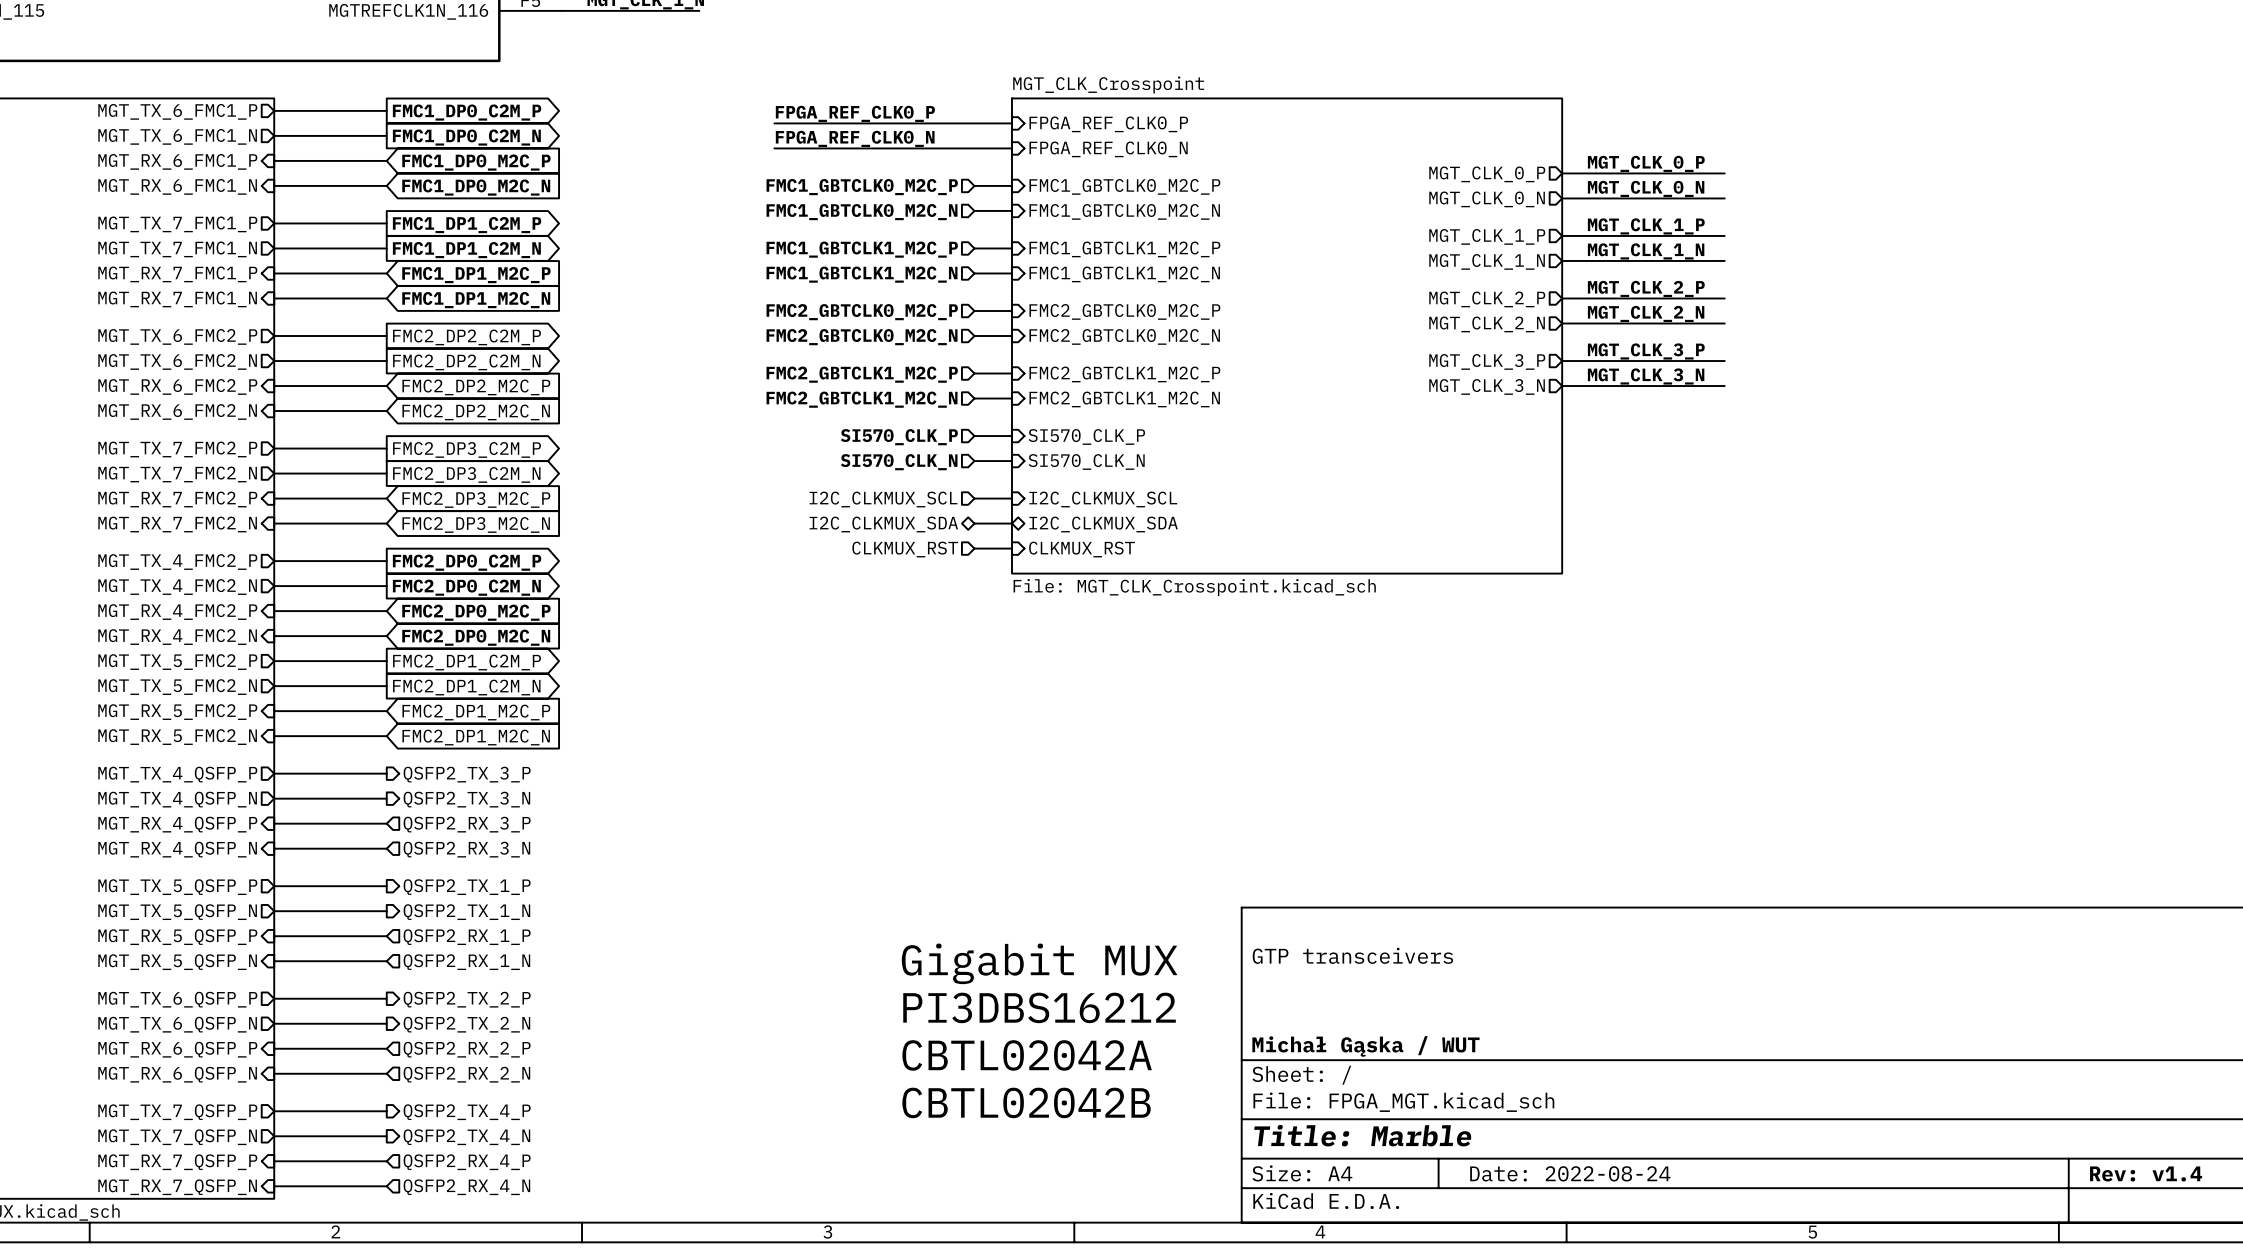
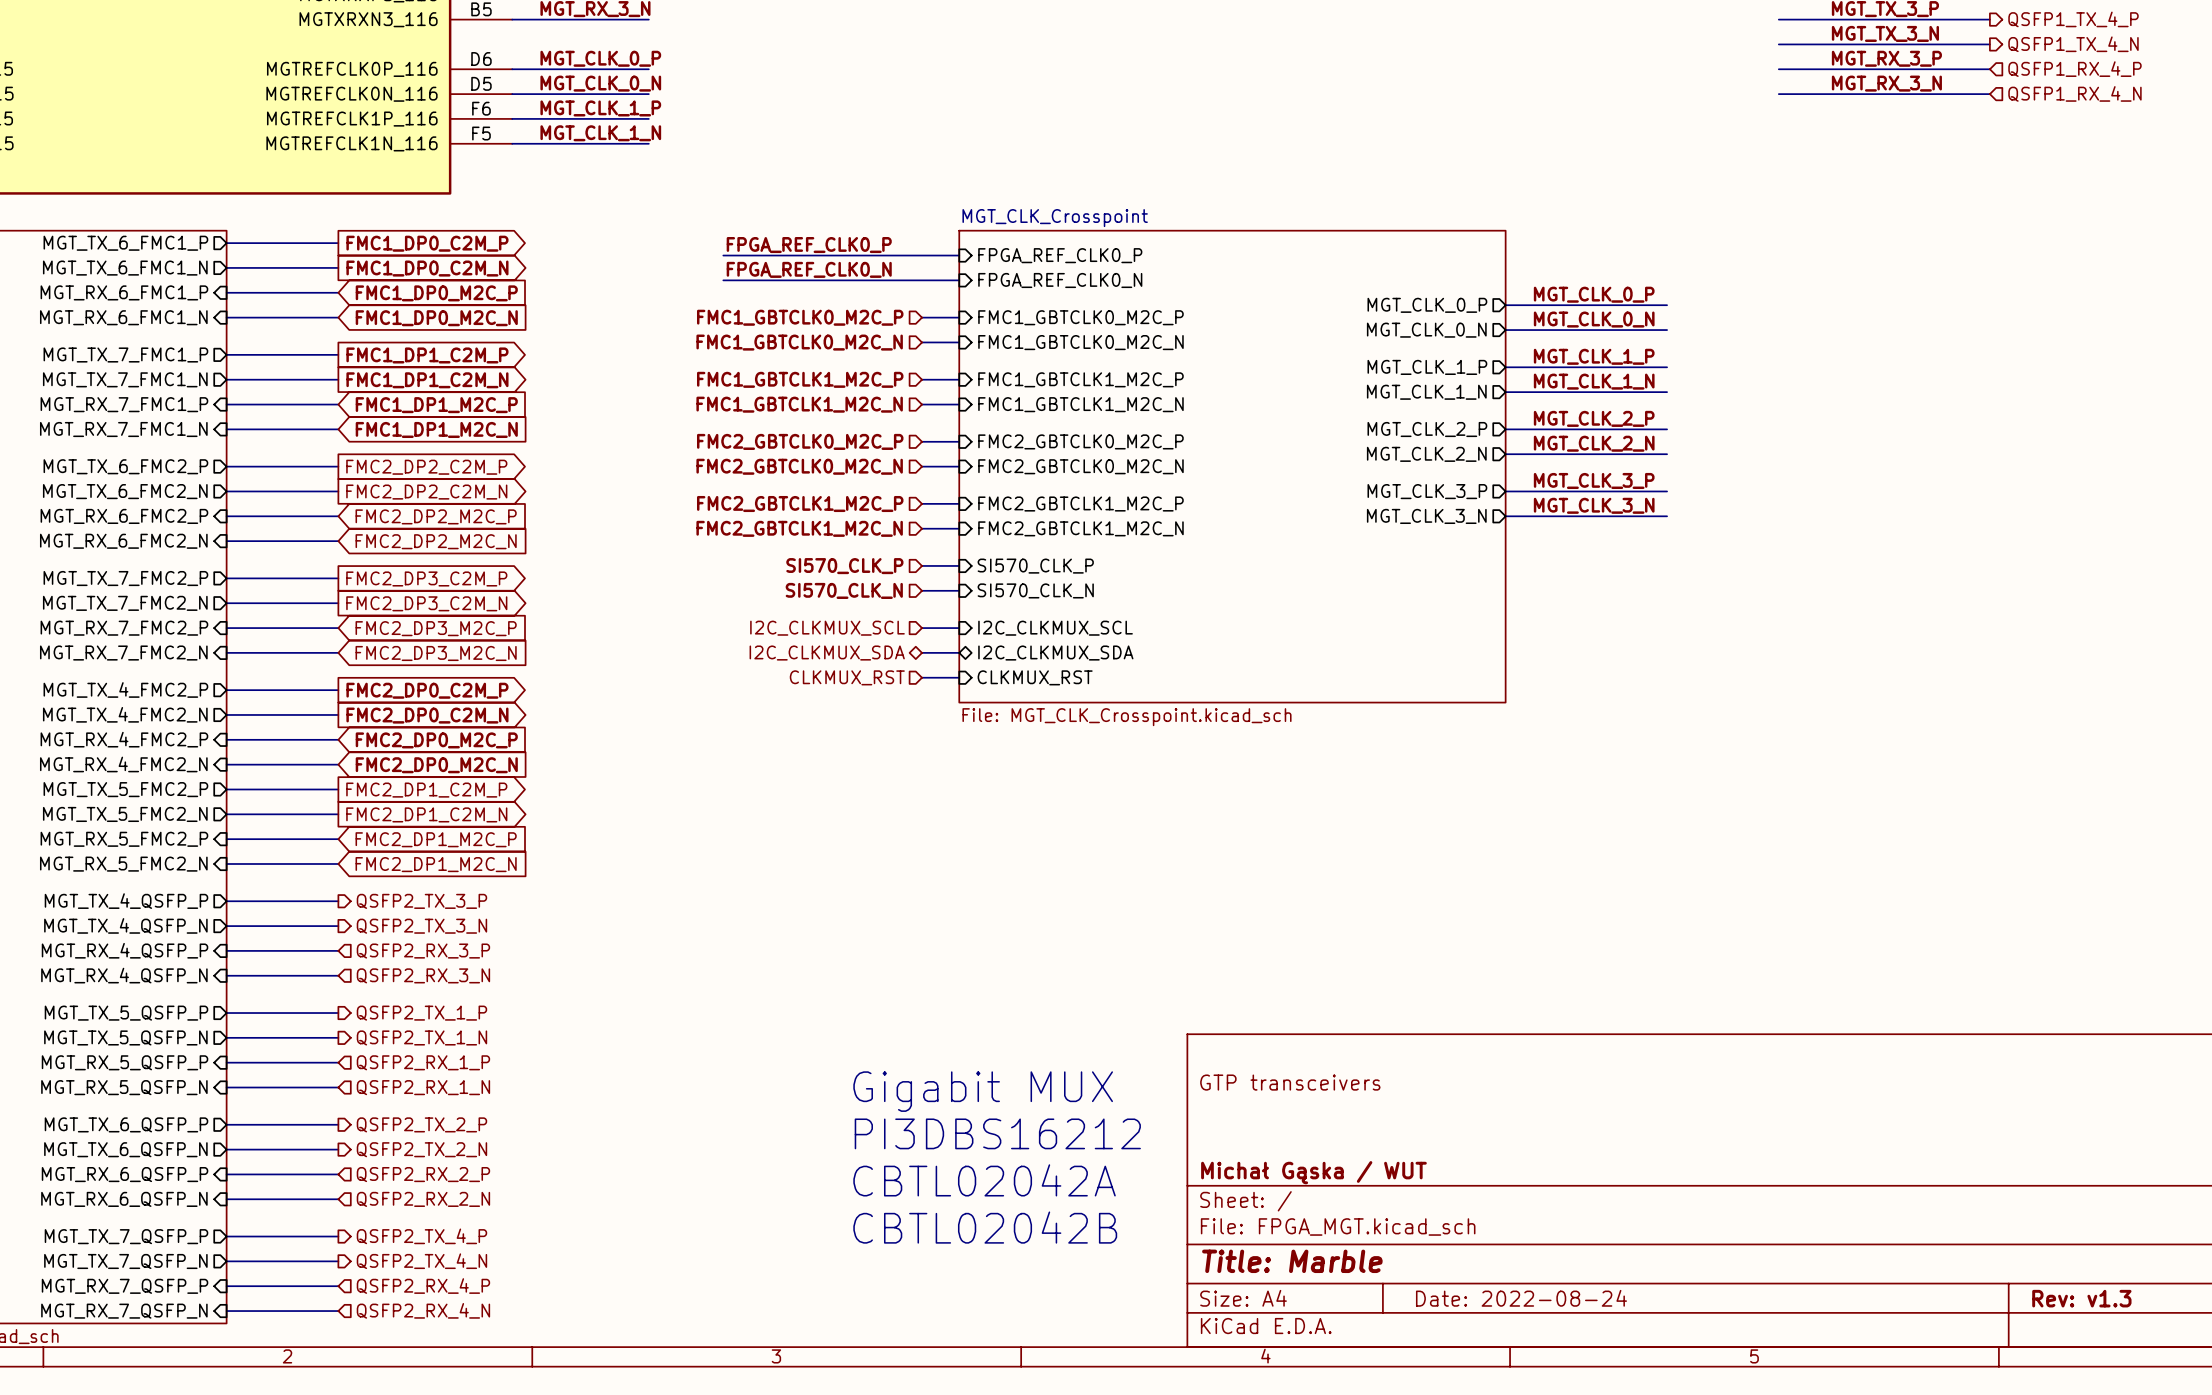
title block: Rev: v1.4 (2146, 1173) -> Rev: v1.3 (2081, 1298)

